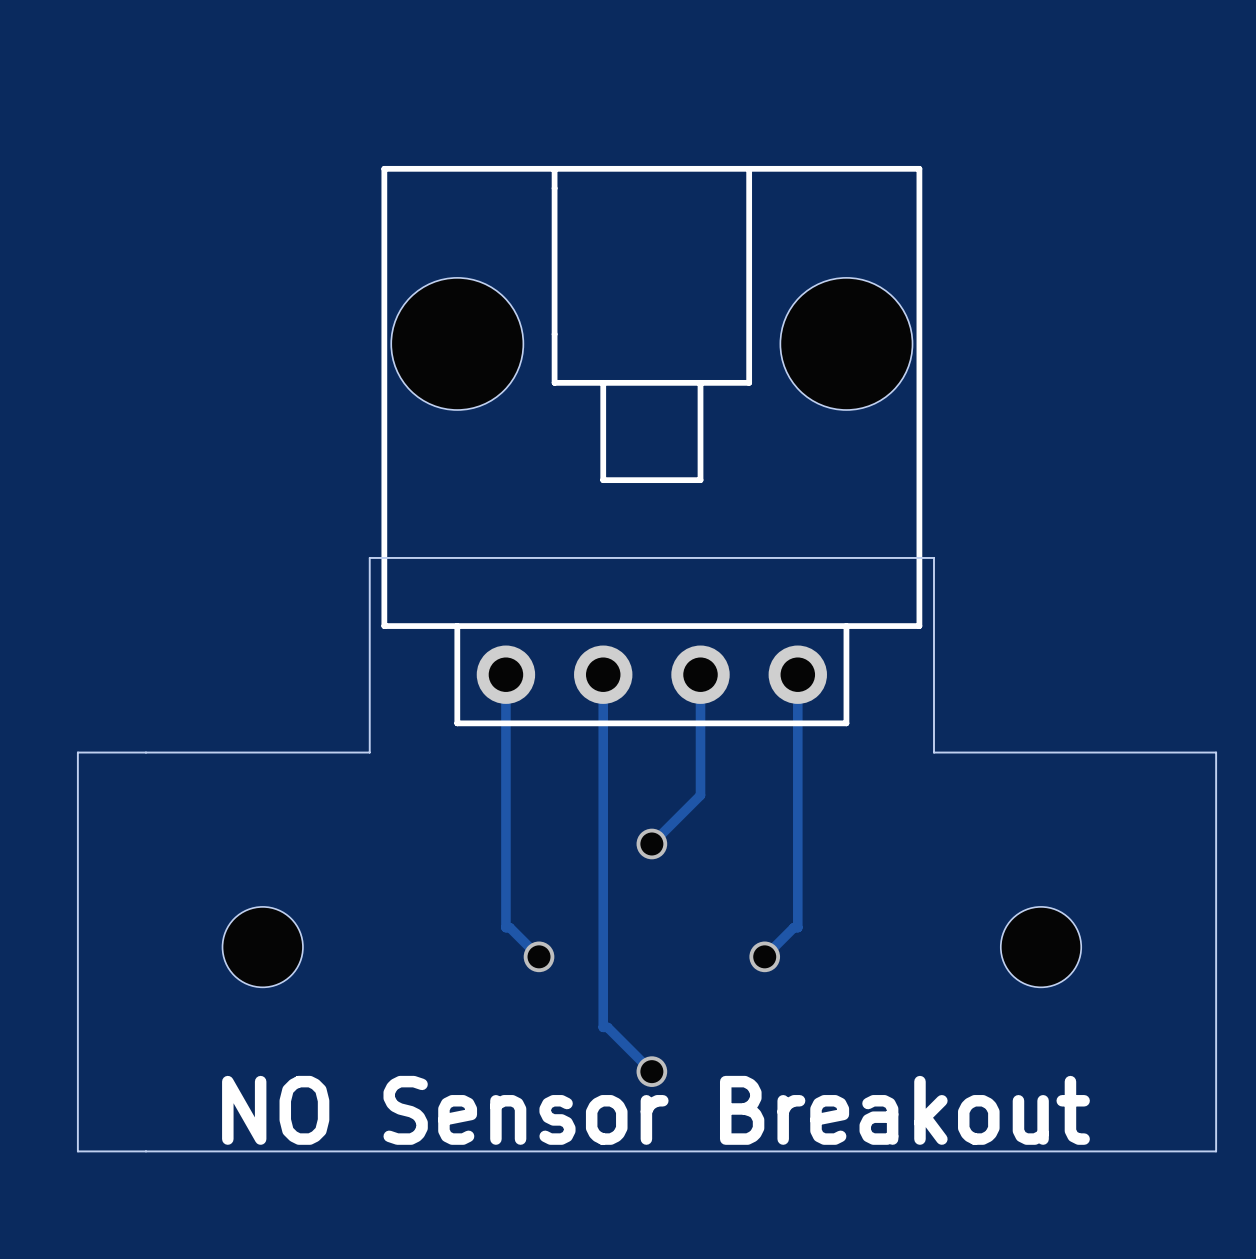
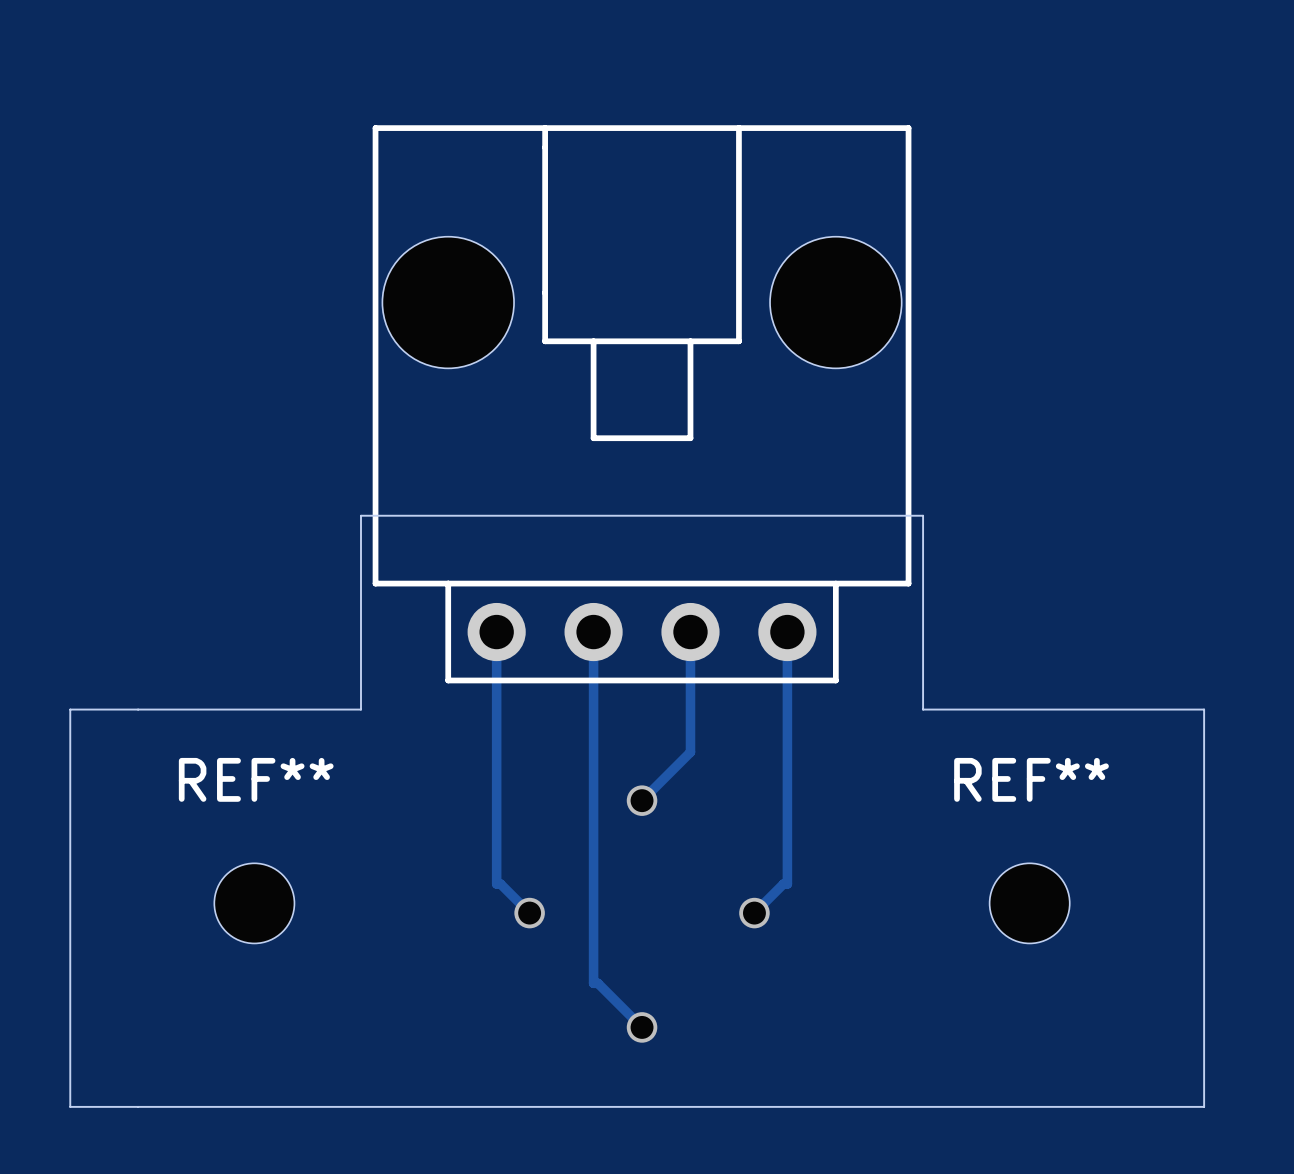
REF** name: none -> REF** (256, 779)
REF** name: none -> REF** (1031, 779)
text: NO Sensor Breakout (655, 1110) -> none

